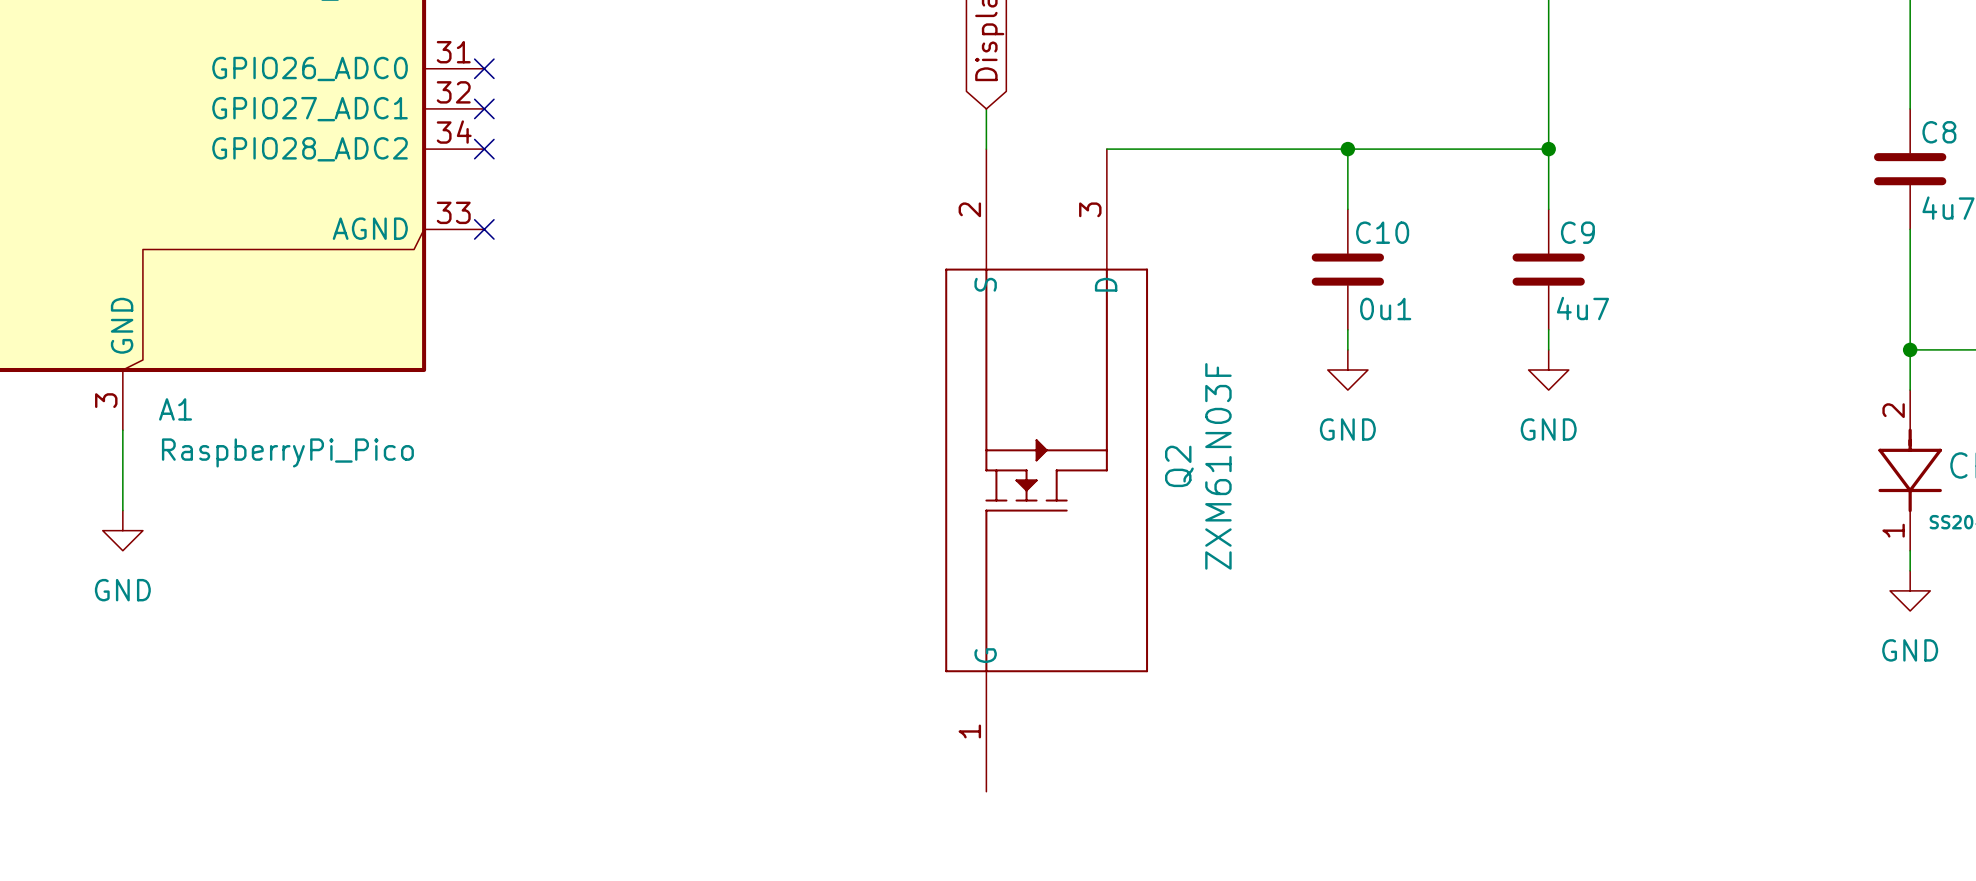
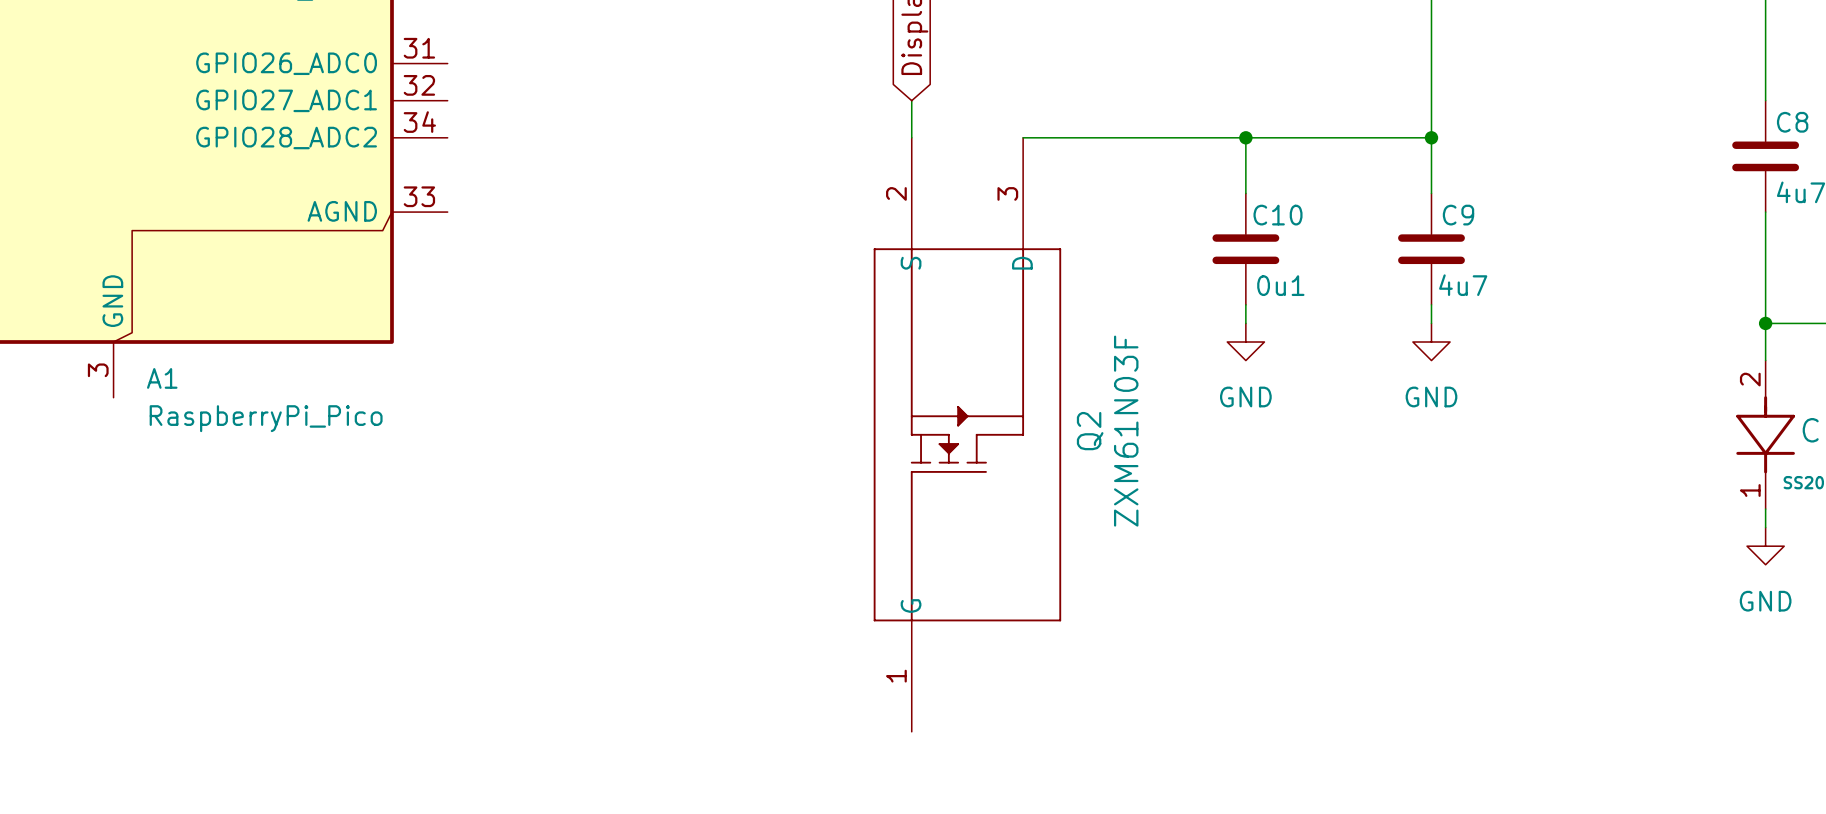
no-connect mark: (484, 68) -> none
no-connect mark: (484, 108) -> none
no-connect mark: (484, 149) -> none
no-connect mark: (484, 229) -> none
wire: (122, 430) (122, 510) -> none
power symbol: GND (122, 530) -> none

